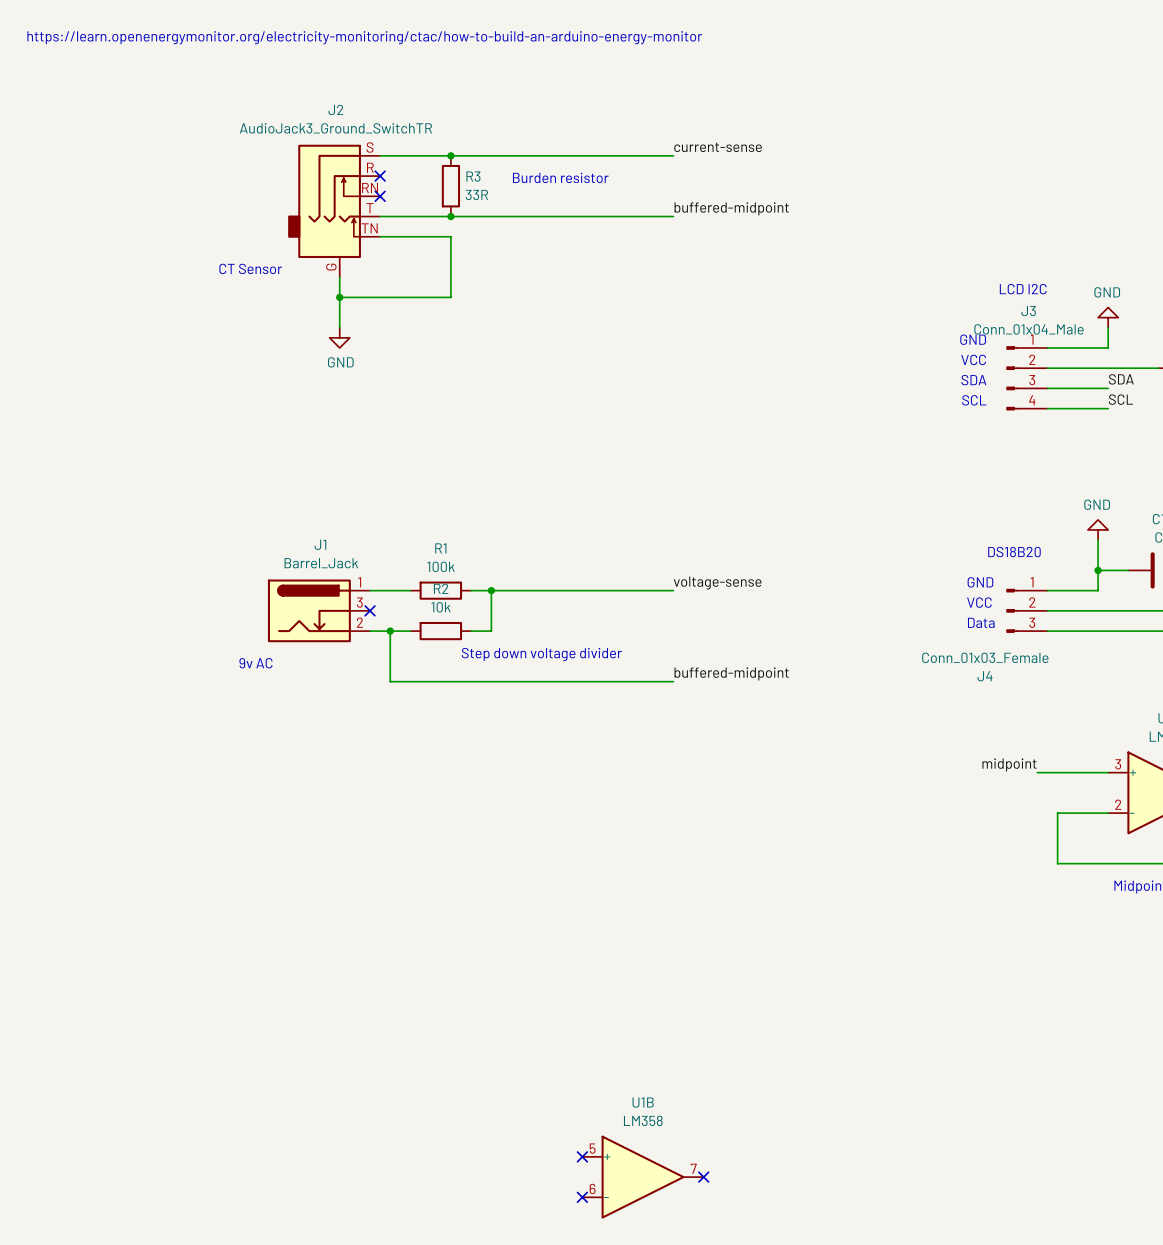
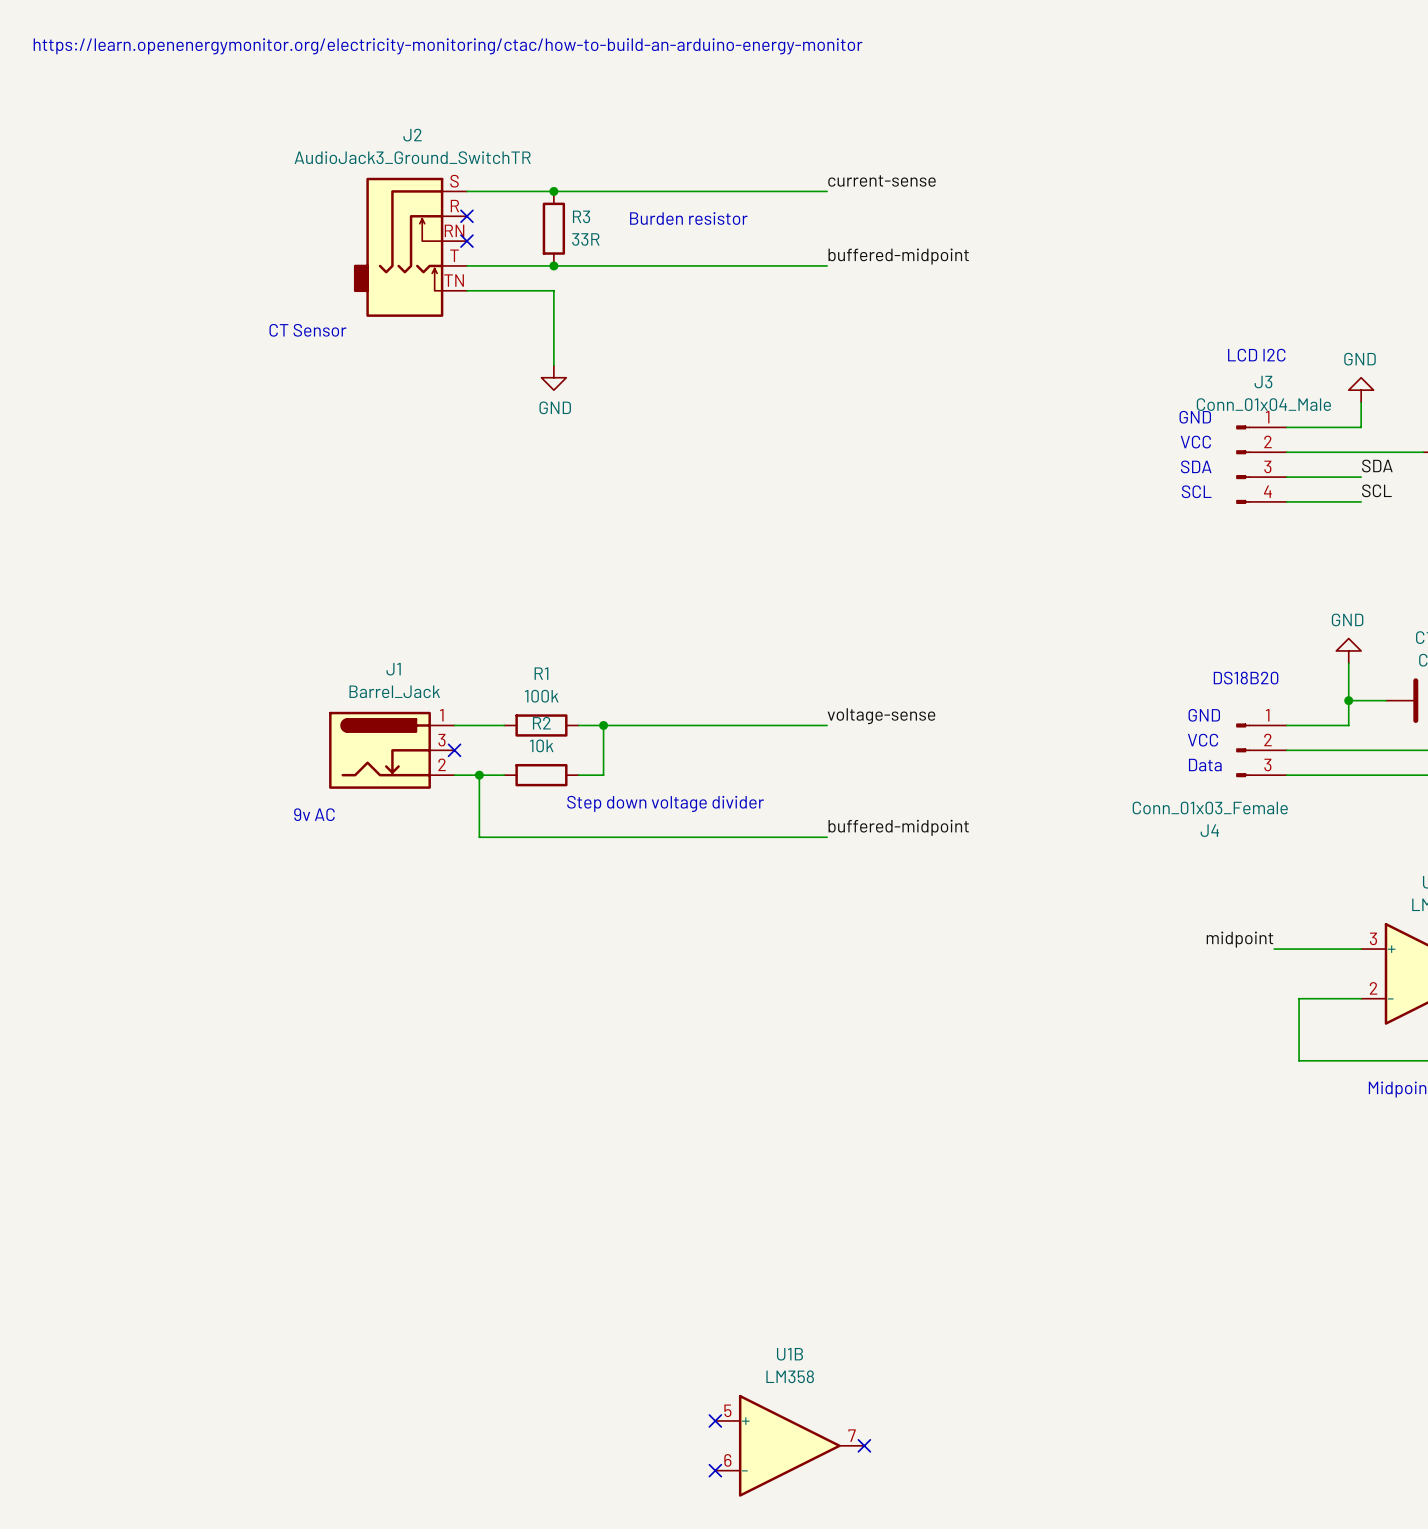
J2 symbol: [288, 144, 381, 278] -> [353, 177, 467, 317]
wire: (339, 277) (339, 327) -> none
wire: (339, 297) (450, 297) -> none
junction: (339, 297) -> none
power symbol position: GND (339, 337) -> GND (553, 377)

